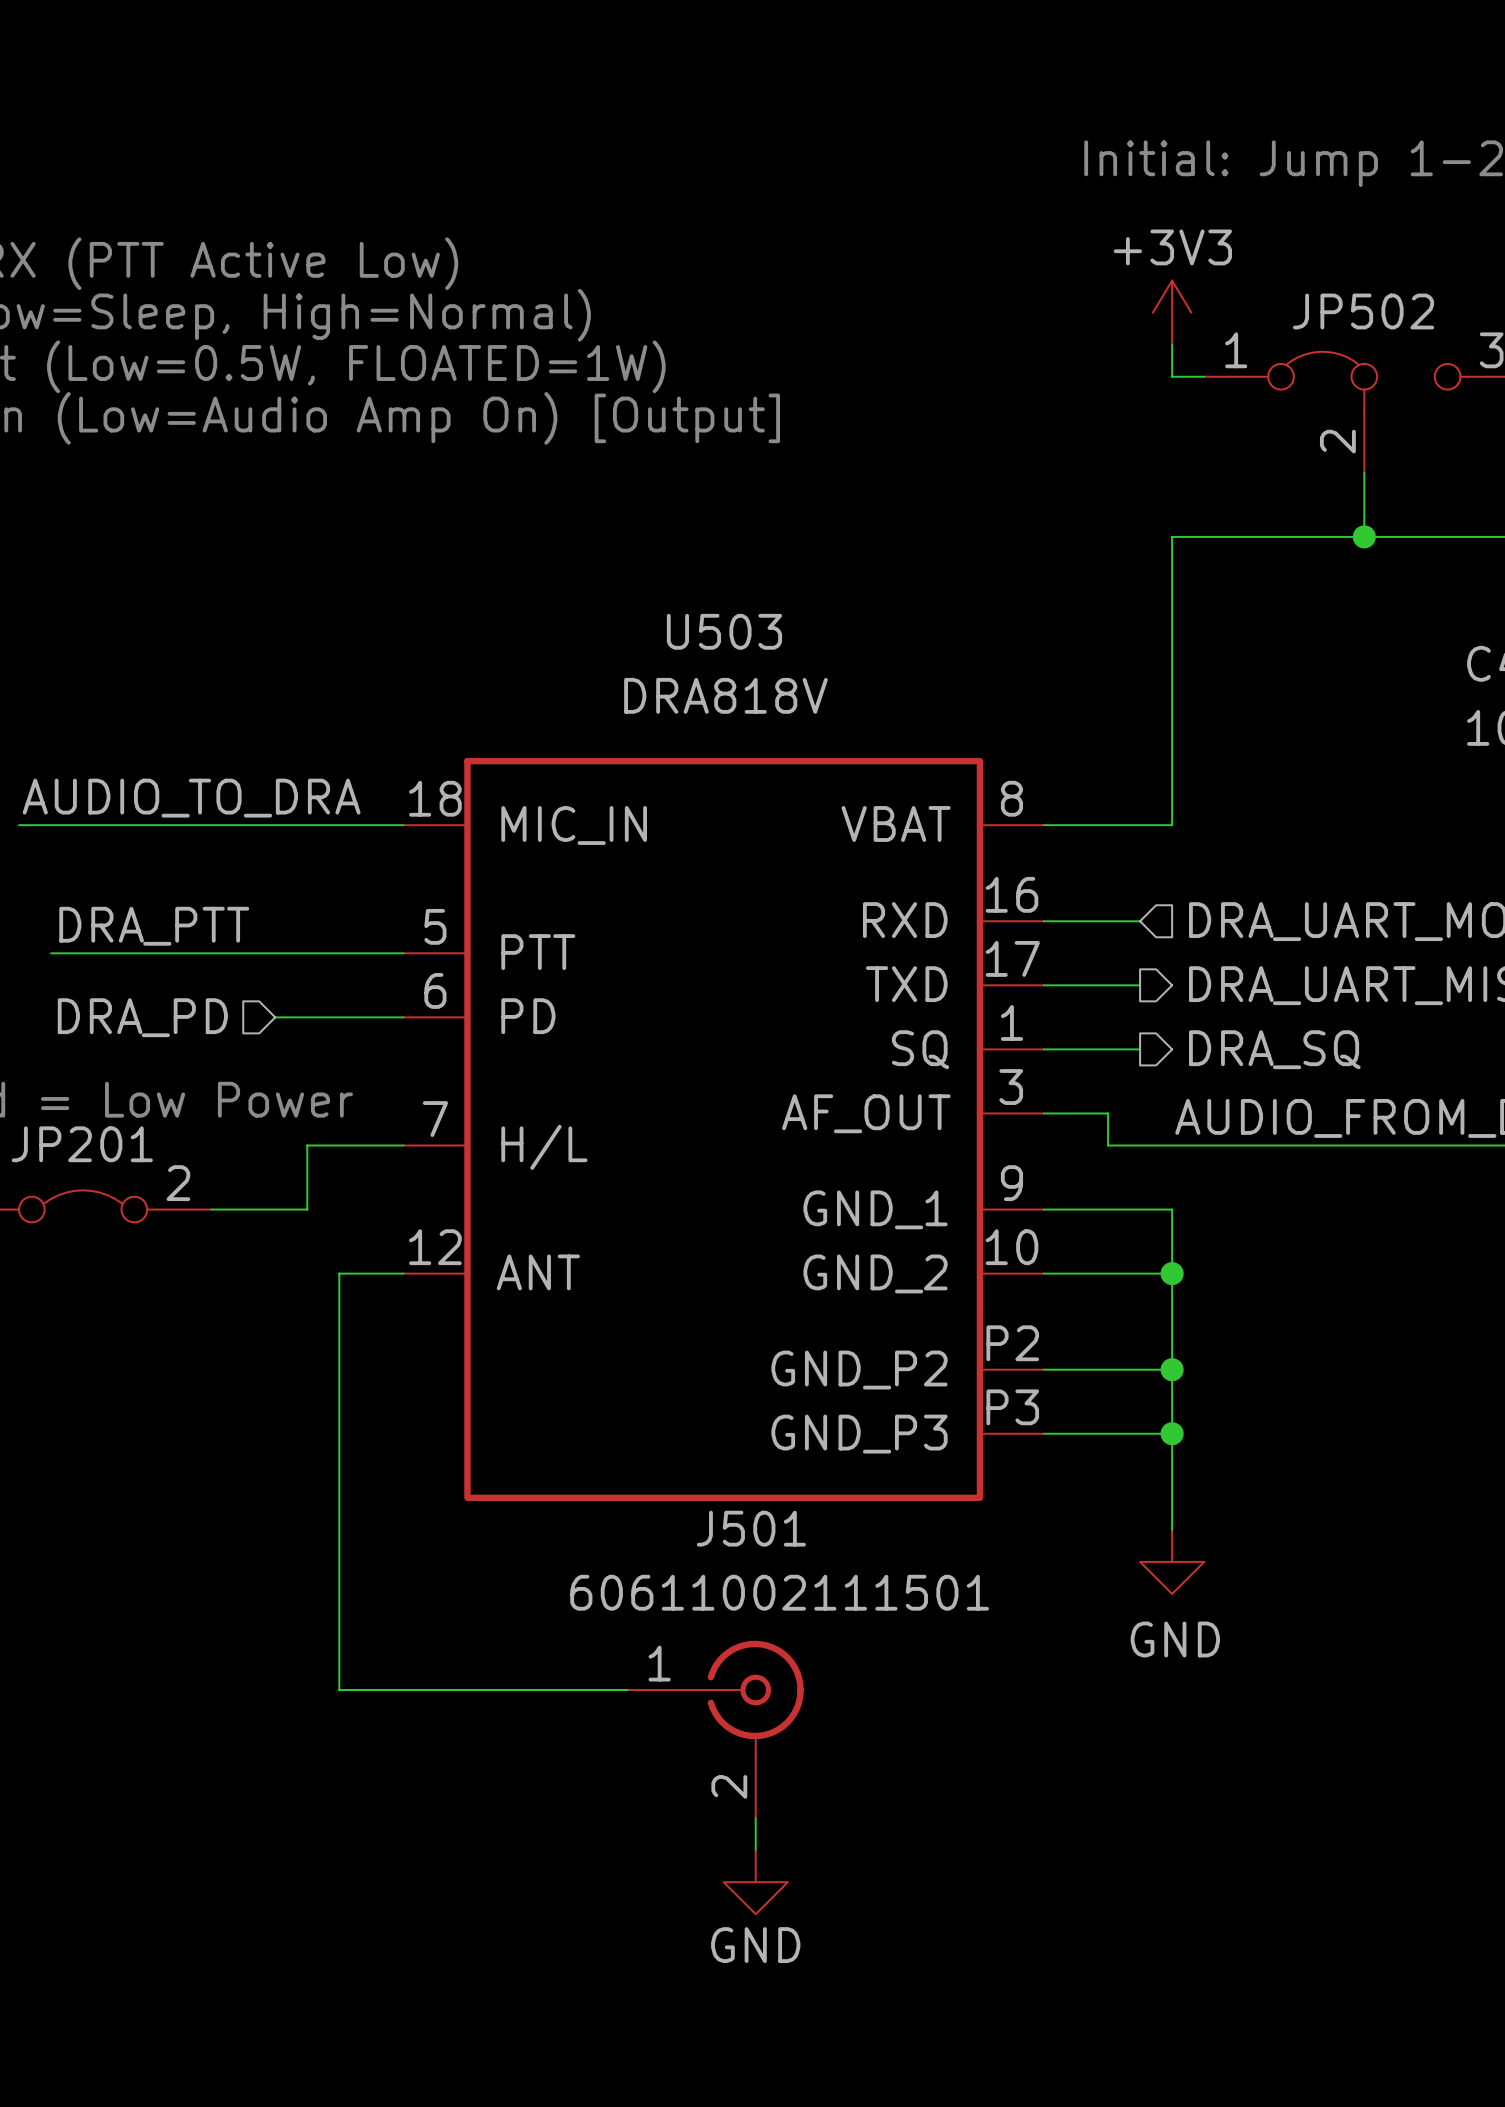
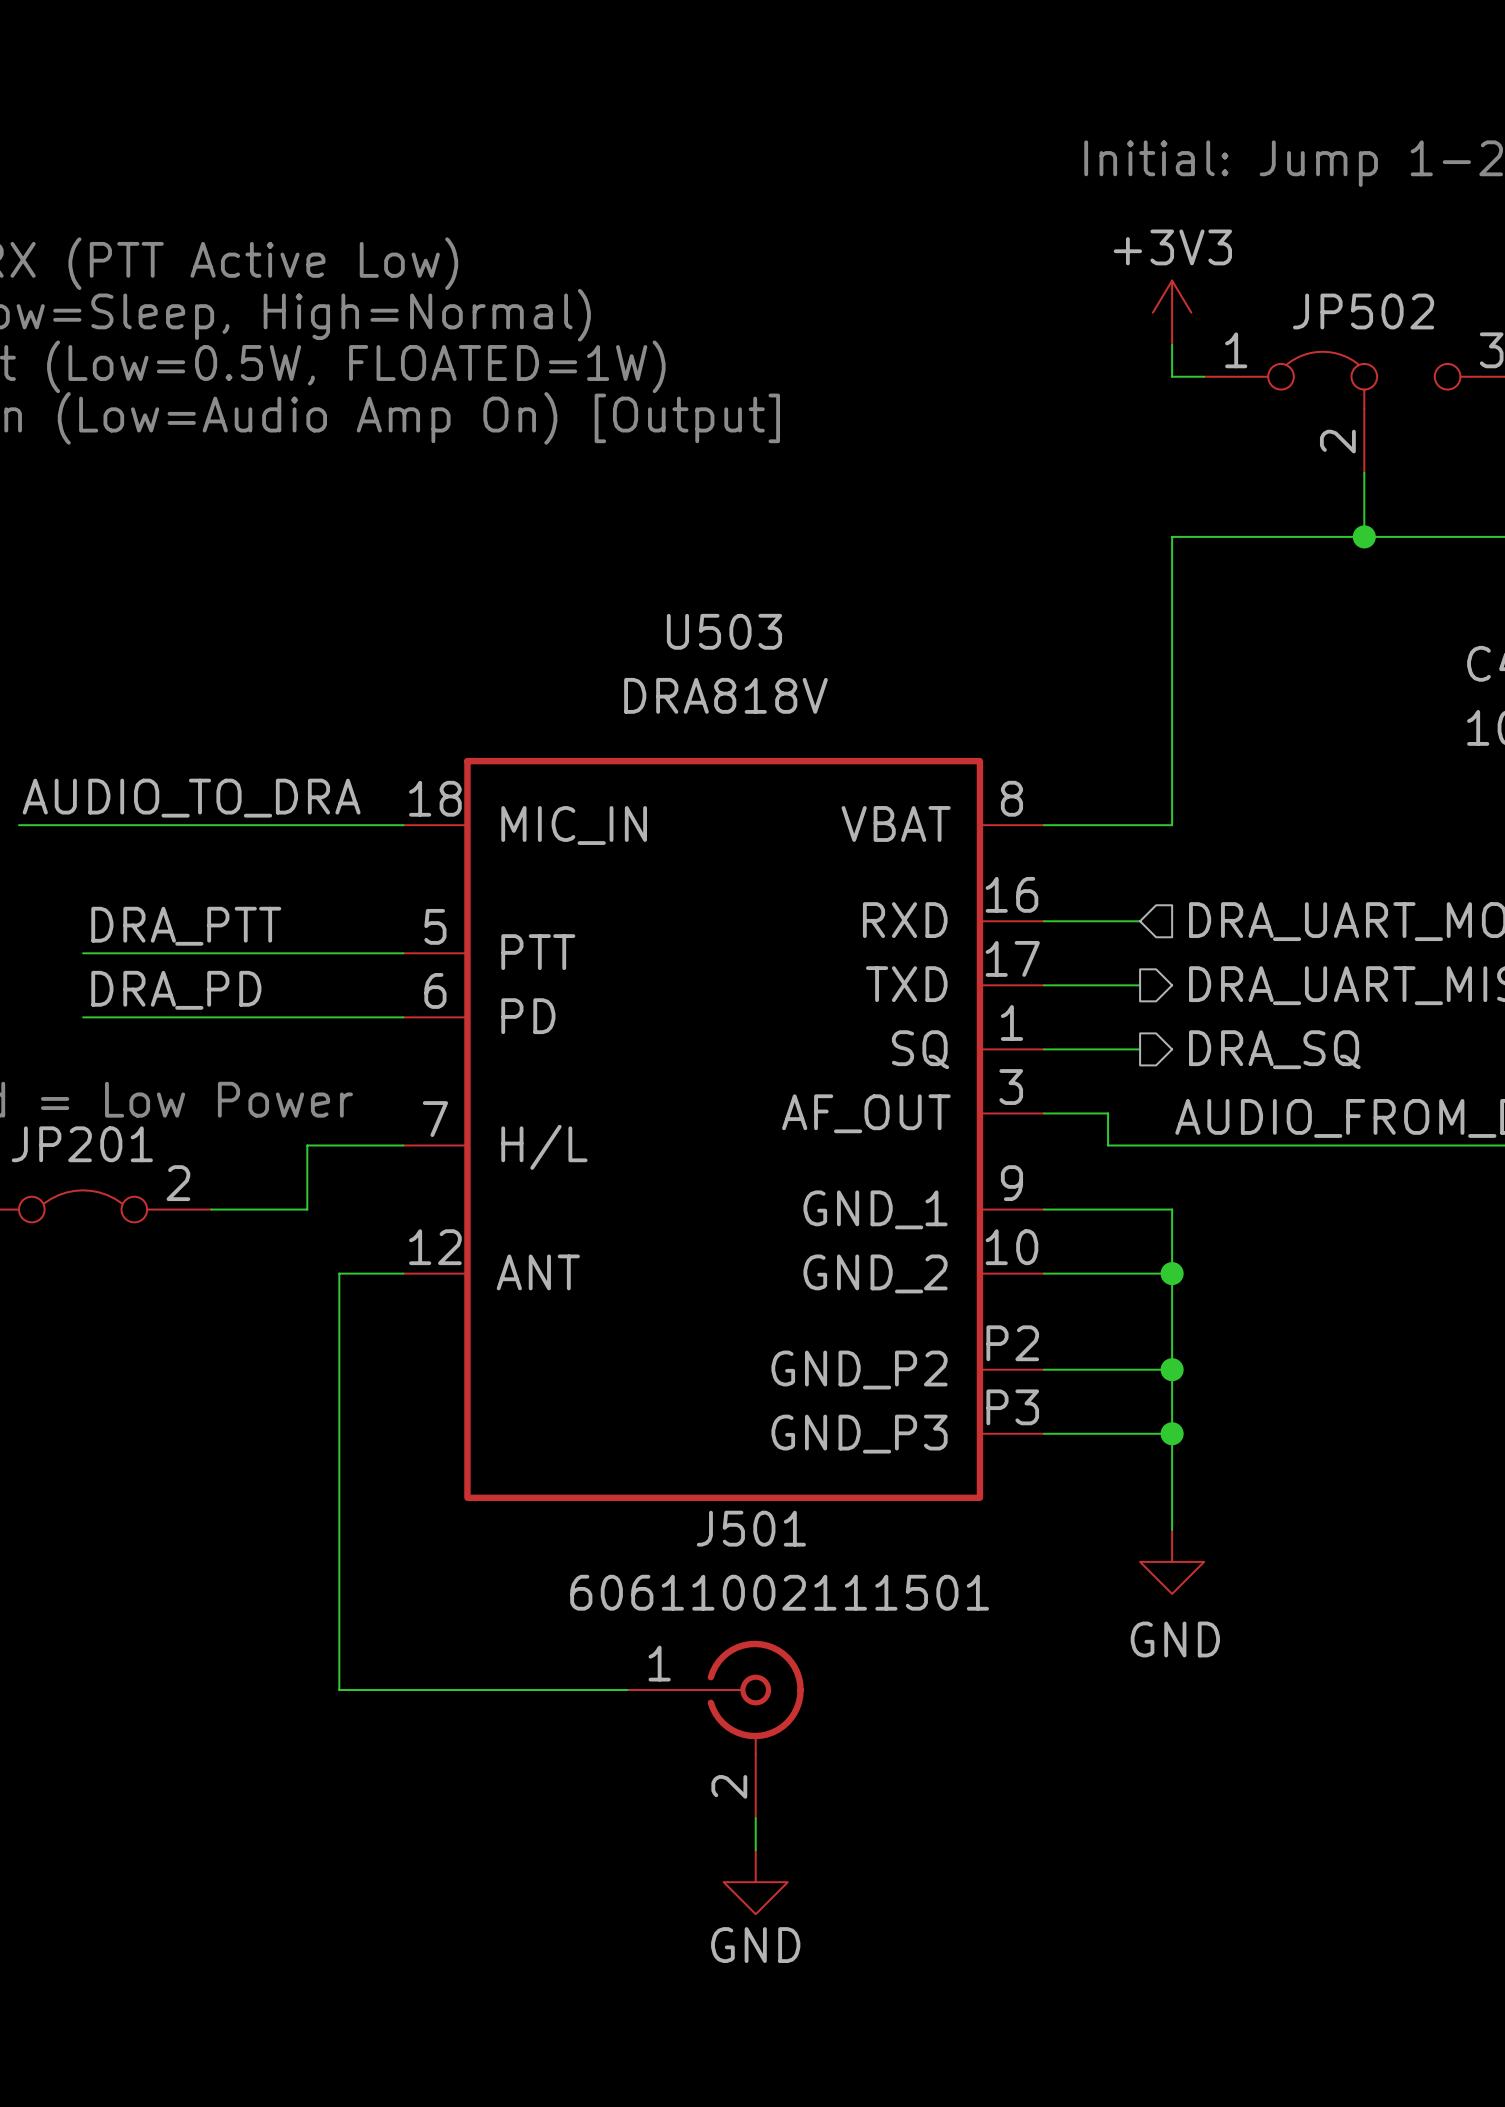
label position: DRA_PTT (154, 926) -> DRA_PTT (186, 926)
wire: (51, 953) (83, 953) -> none
label: none -> DRA_PD (176, 990)
wire: none -> (83, 1017) (275, 1017)
hierarchical label: DRA_PD (142, 1017) -> none

